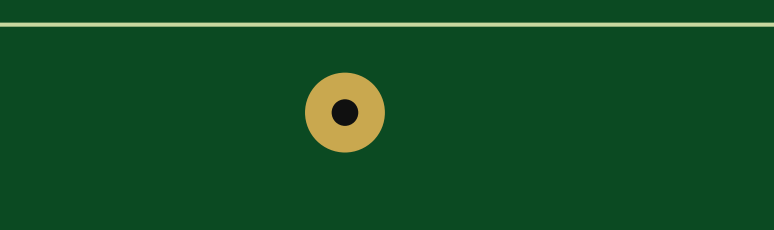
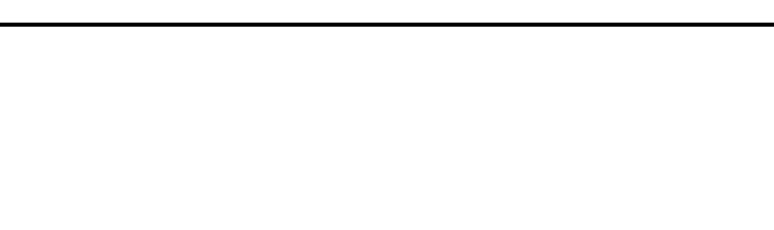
via: (344, 112) -> none

